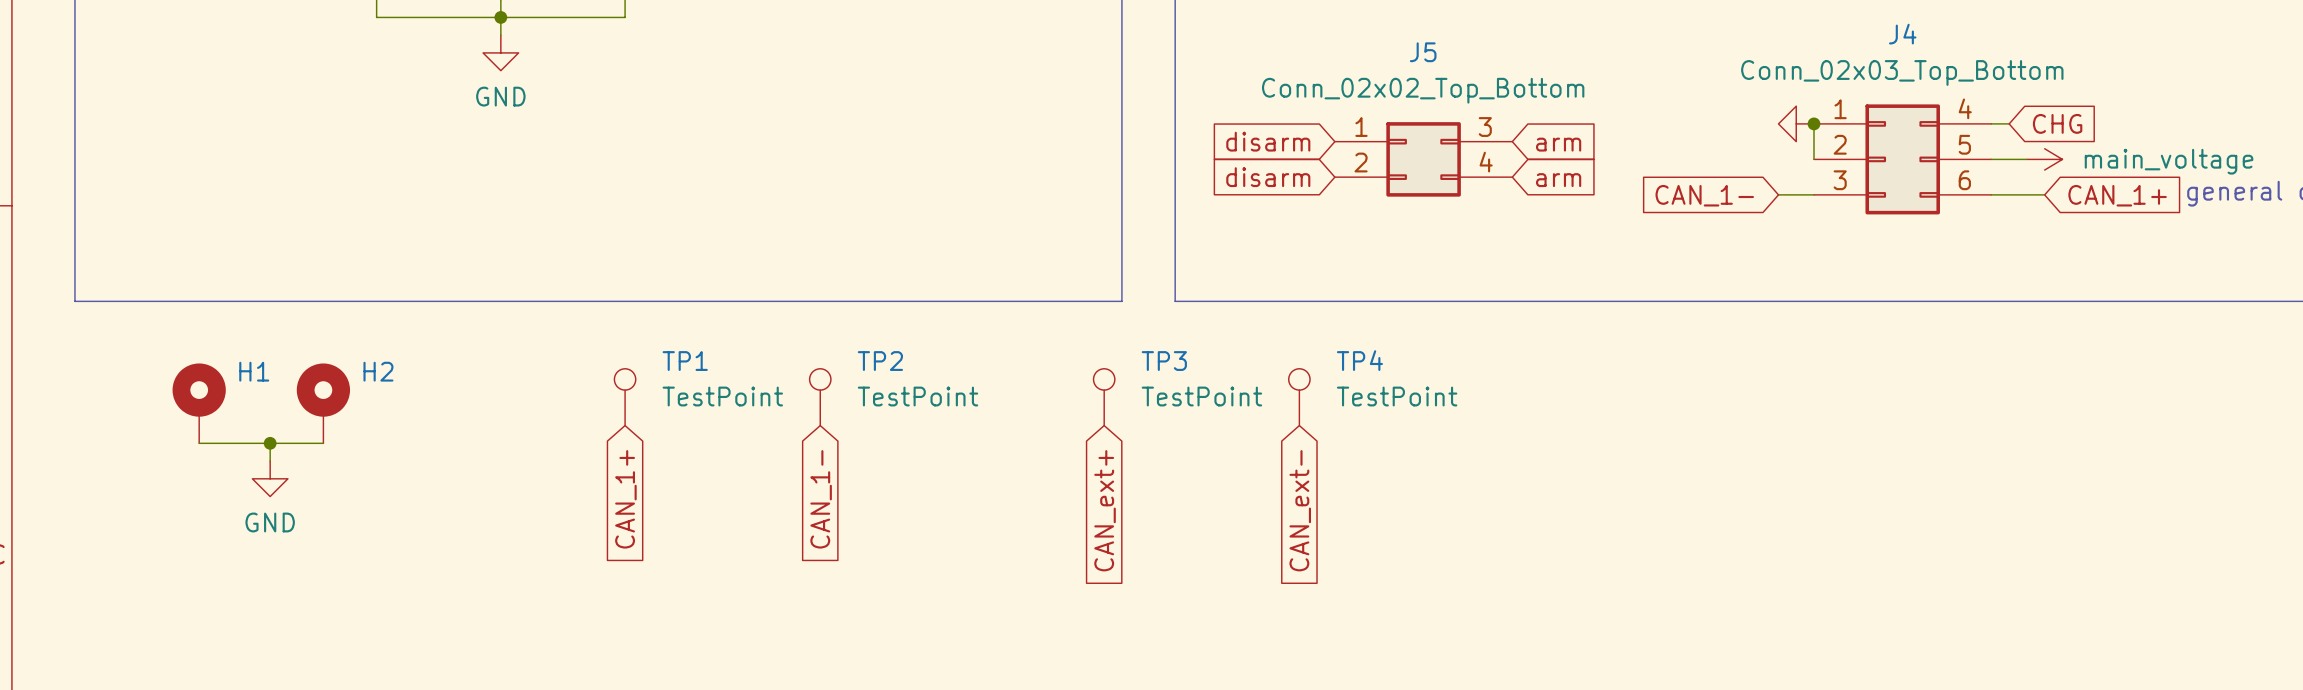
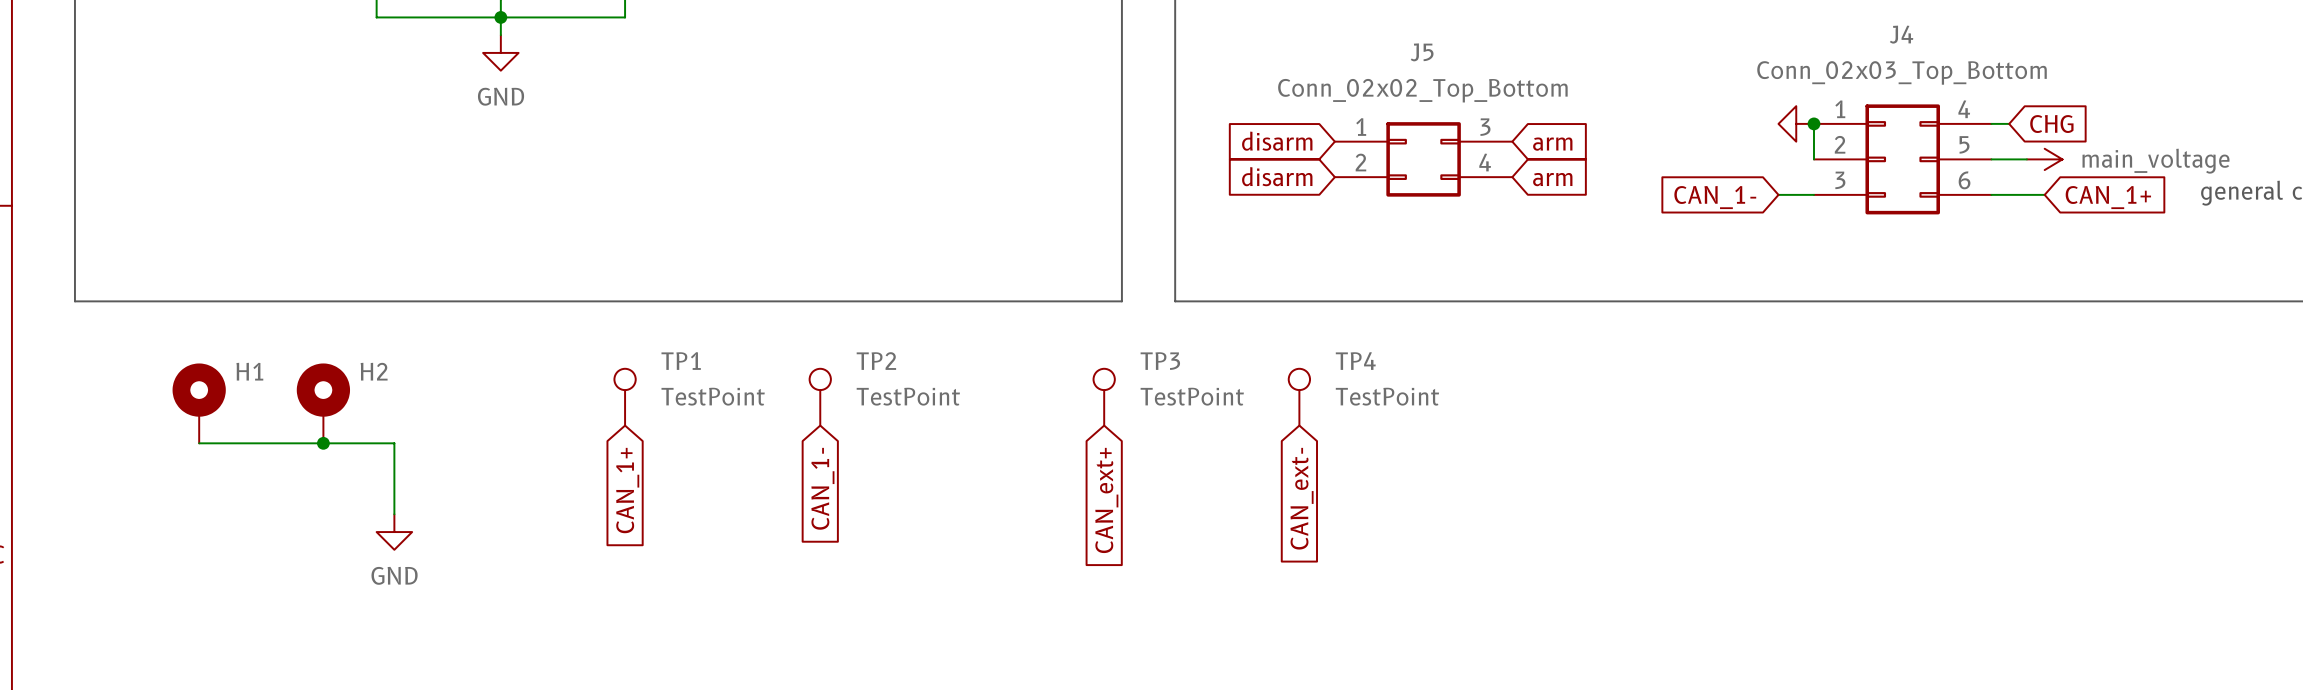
wire: (270, 443) (270, 461) -> none
junction position: (270, 443) -> (323, 443)
wire: none -> (323, 443) (394, 443) (394, 514)
power symbol position: GND (270, 478) -> GND (394, 532)

